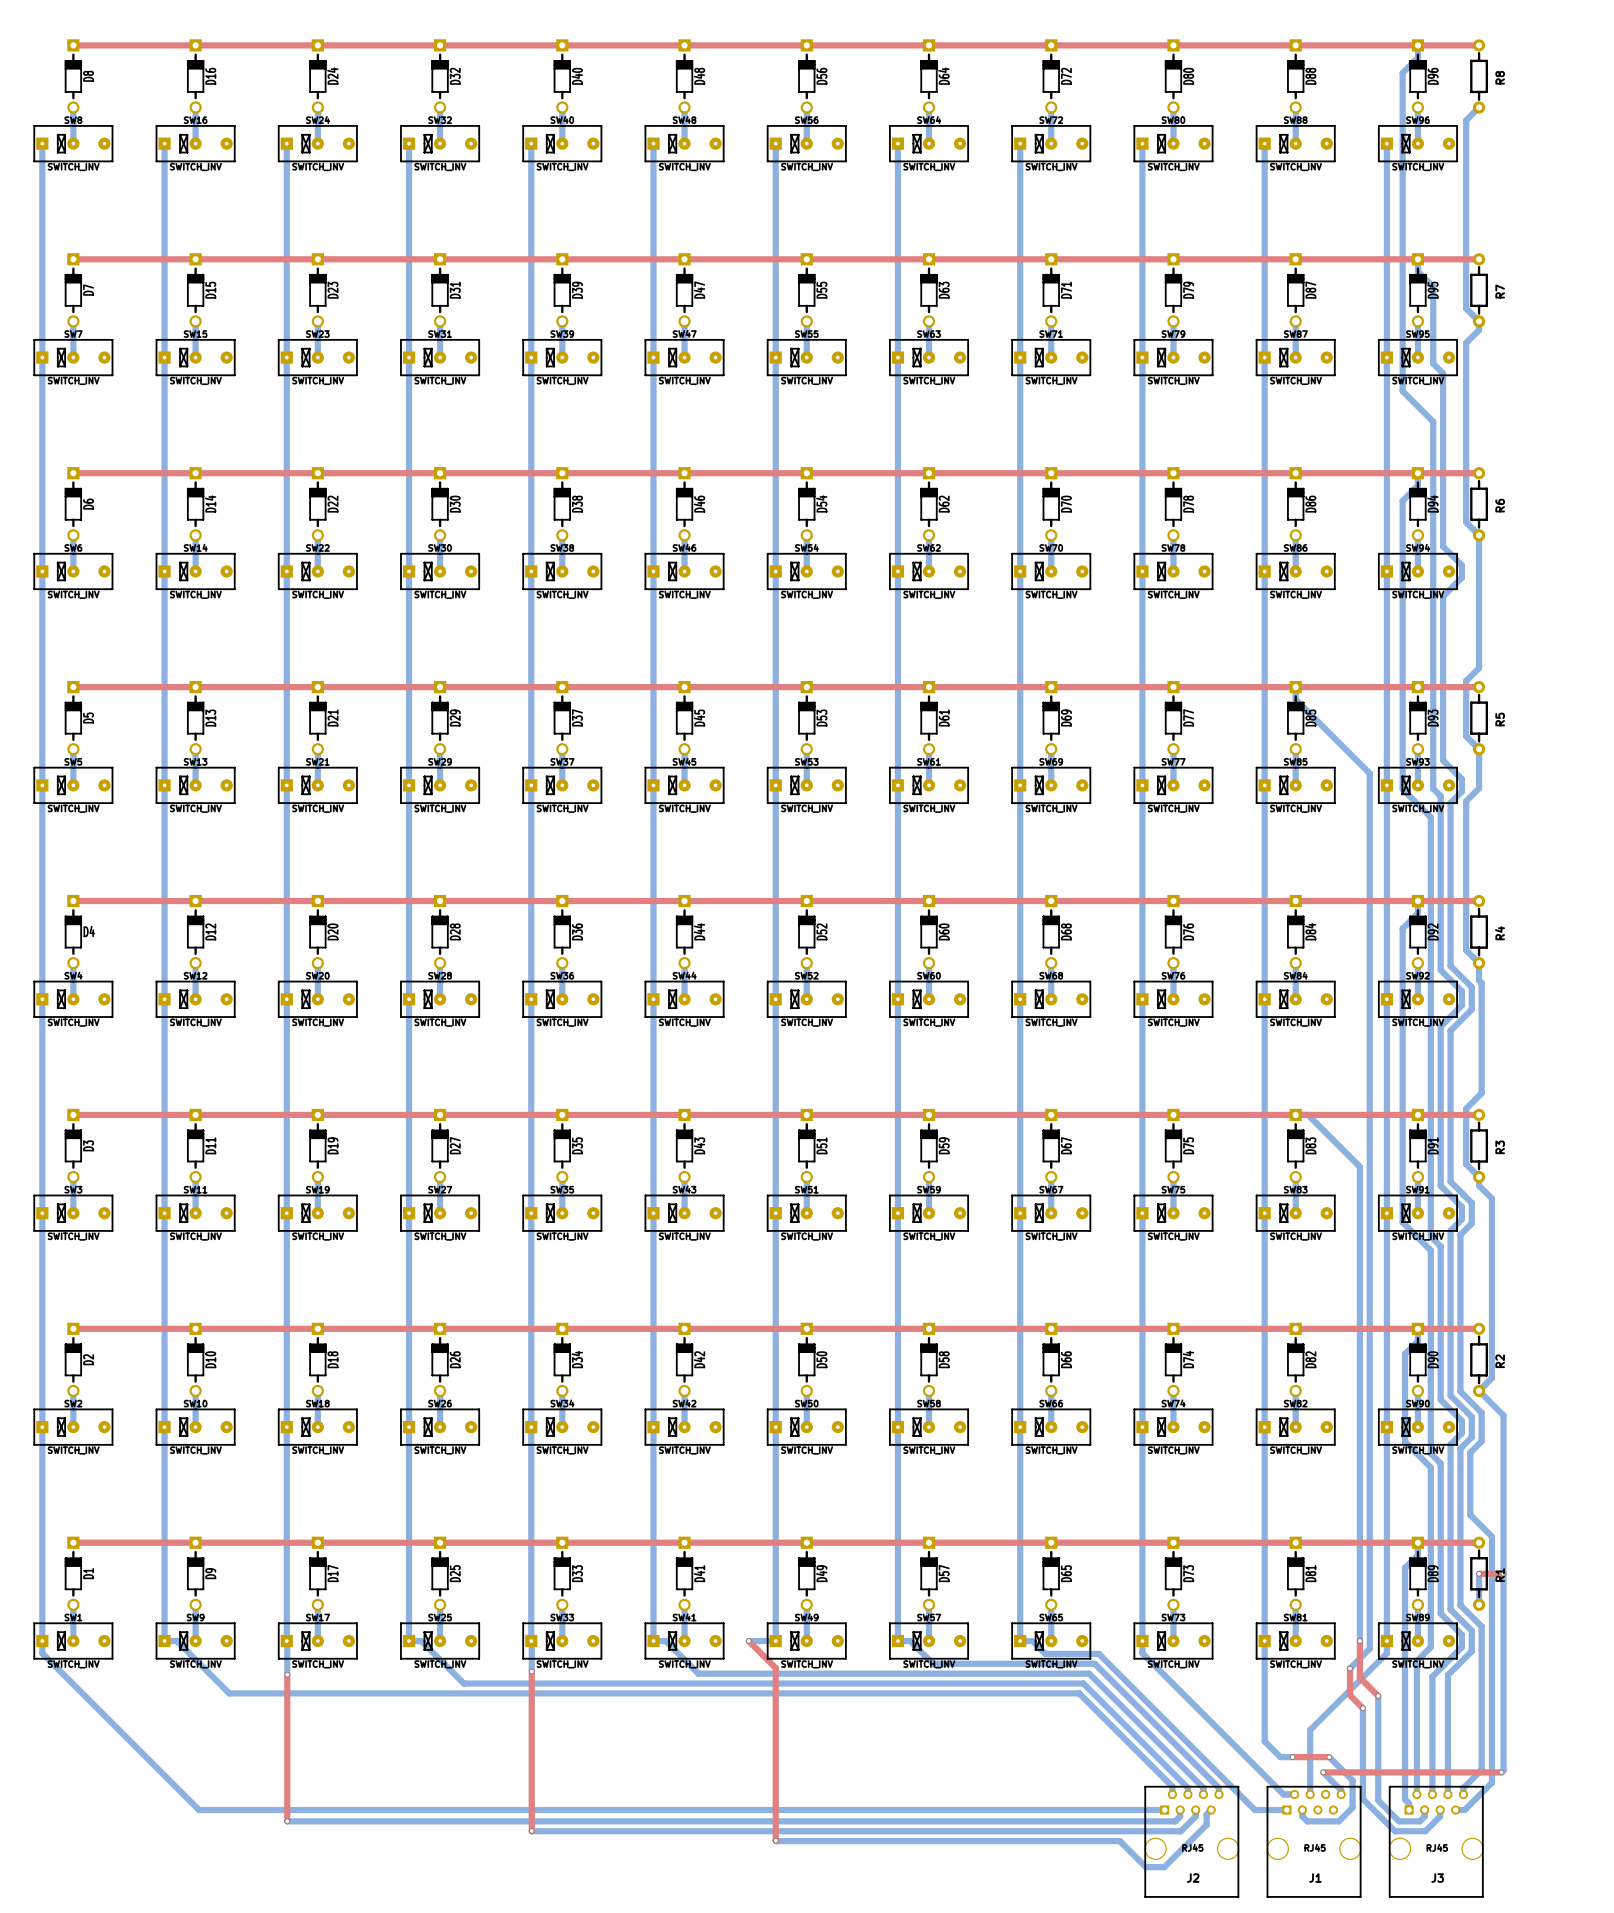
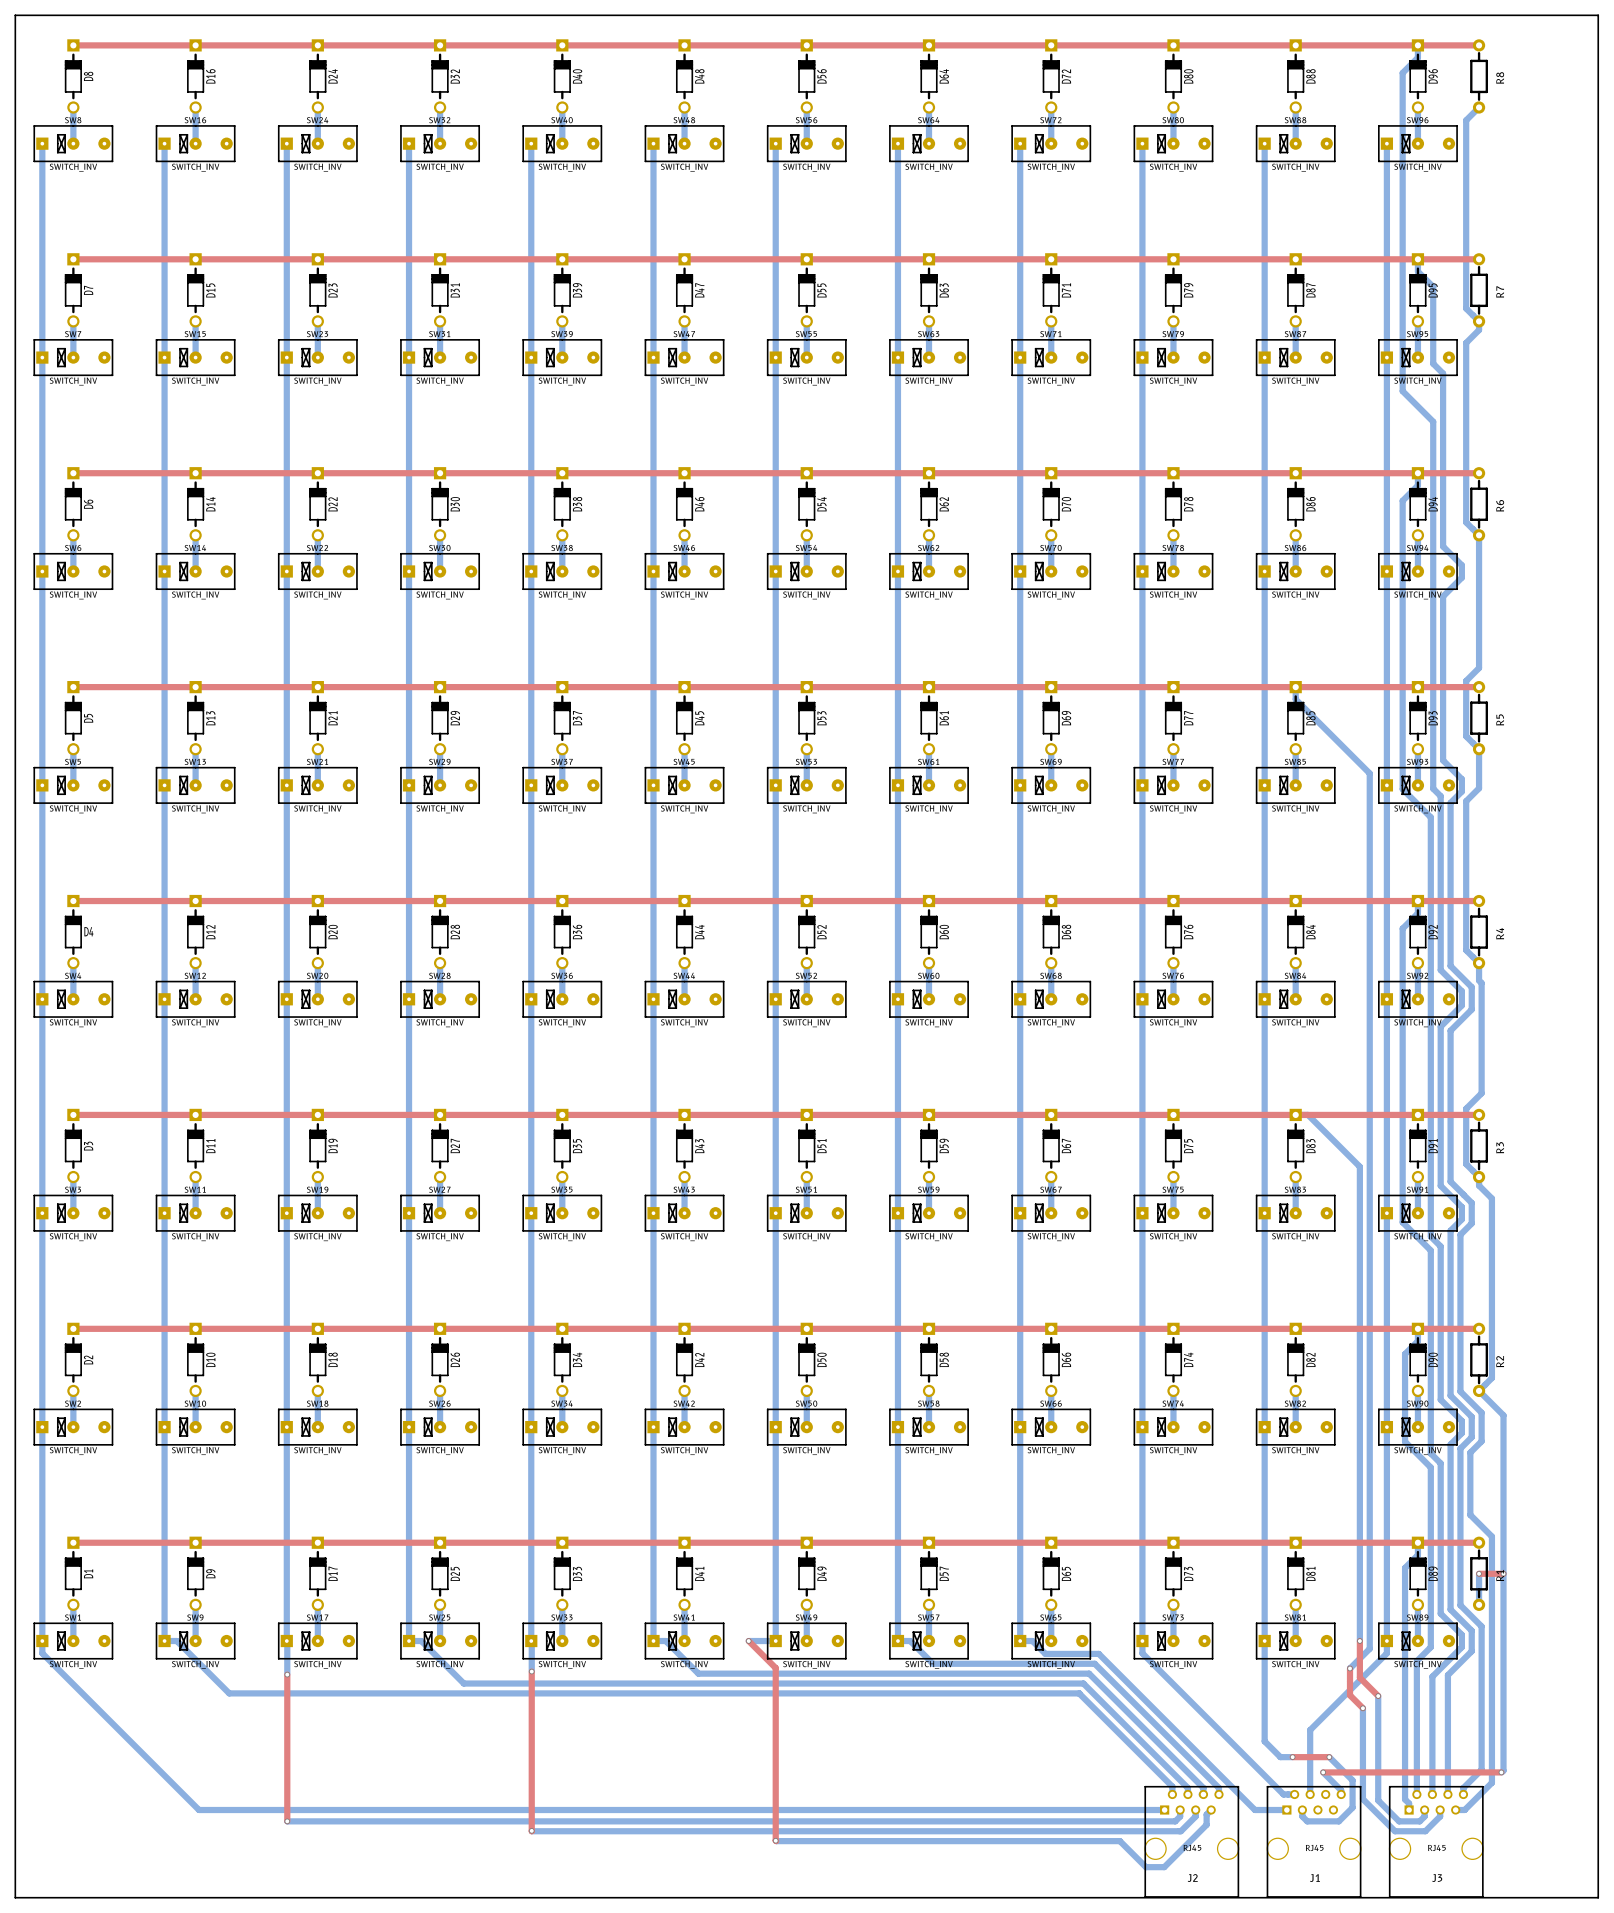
board edge: none -> (15, 15) (15, 1897) (1598, 1897) (1598, 15) (15, 15)

